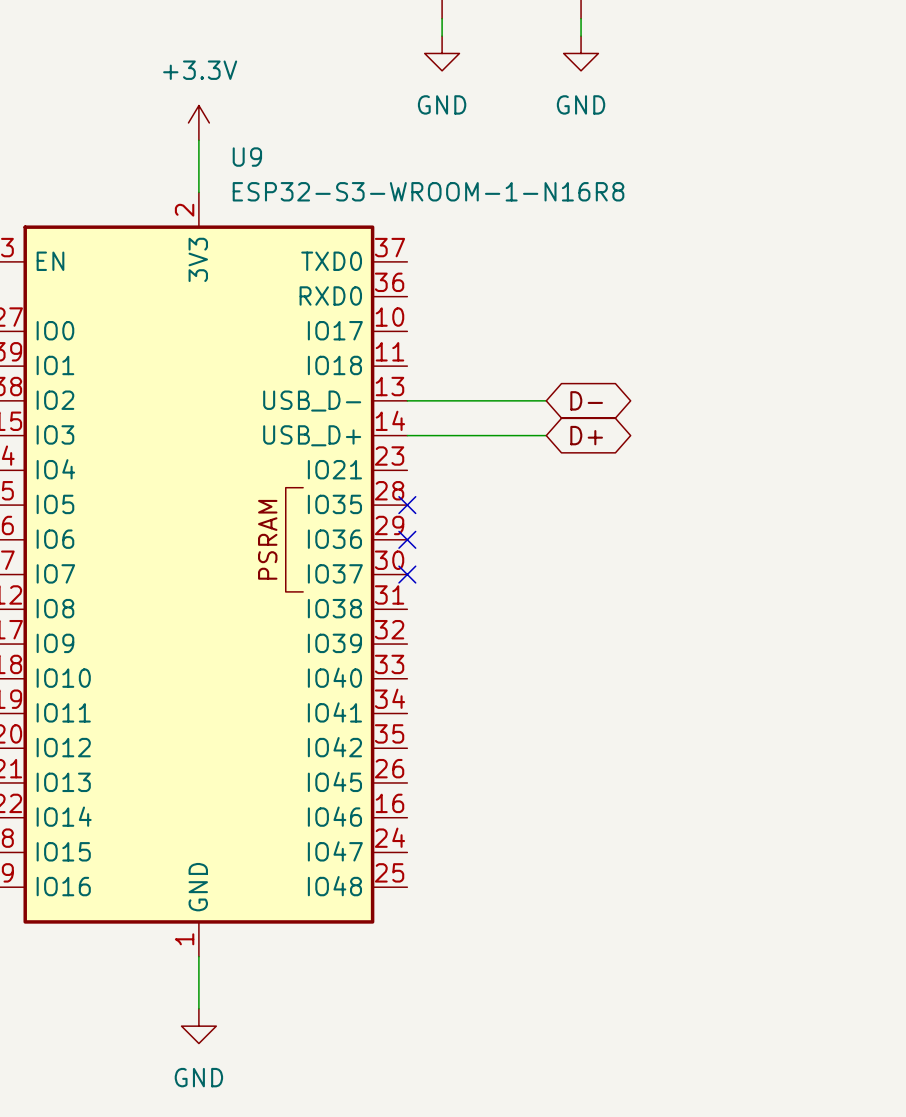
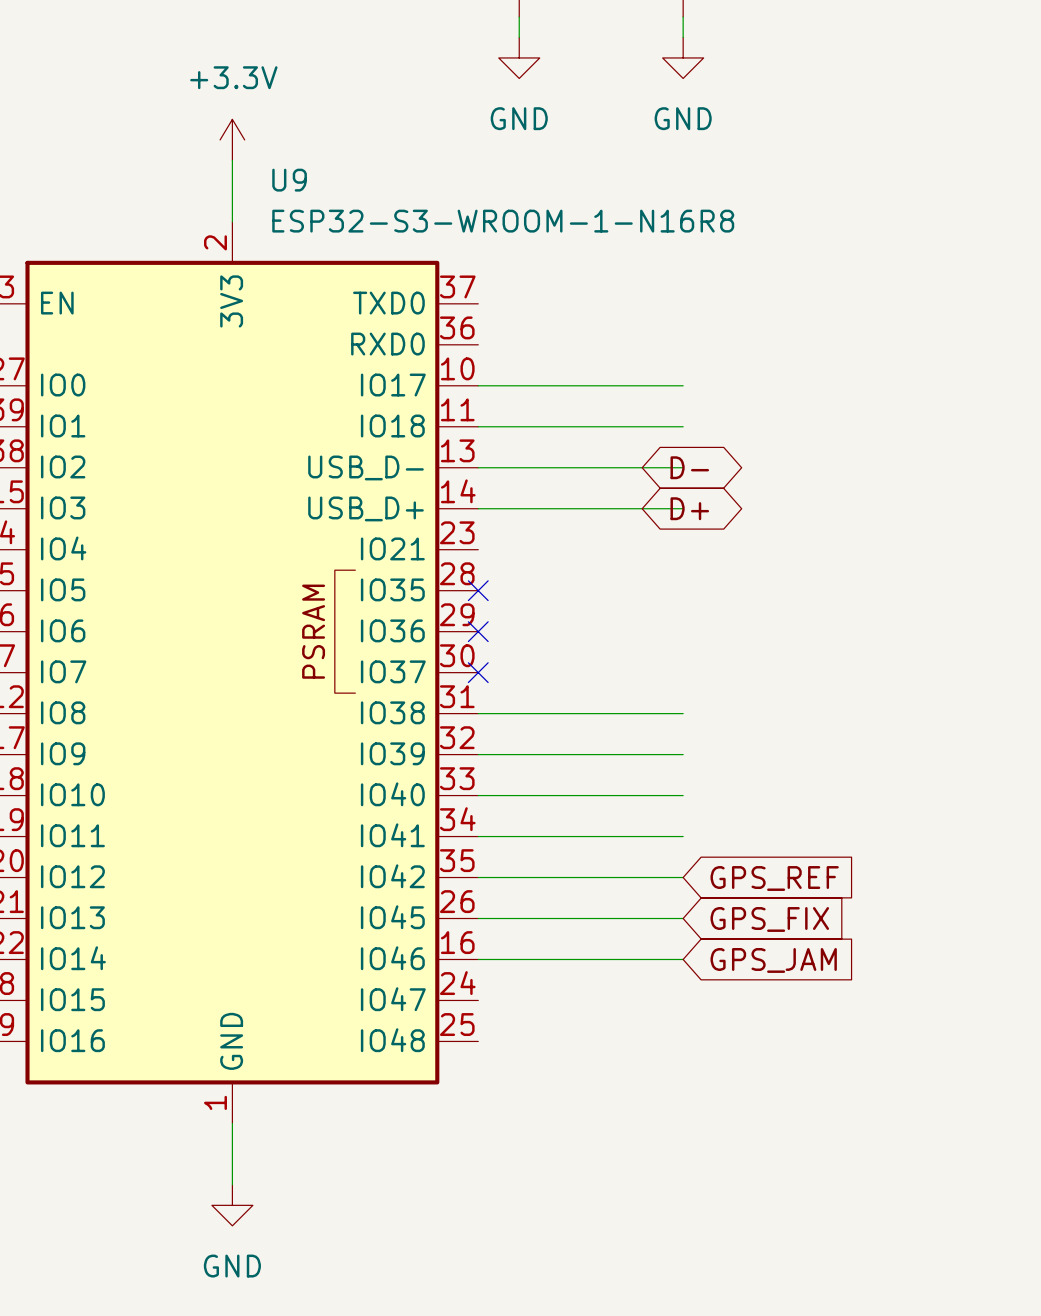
wire: none -> (478, 385) (683, 385)
wire: none -> (478, 426) (683, 426)
wire: none -> (642, 467) (683, 467)
wire: none -> (642, 508) (683, 508)
wire: none -> (478, 713) (683, 713)
wire: none -> (478, 754) (683, 754)
wire: none -> (478, 795) (683, 795)
wire: none -> (478, 836) (683, 836)
wire: none -> (478, 877) (683, 877)
global label: none -> GPS_REF (774, 878)
wire: none -> (478, 918) (683, 918)
global label: none -> GPS_FIX (769, 919)
wire: none -> (478, 959) (683, 959)
global label: none -> GPS_JAM (773, 960)

